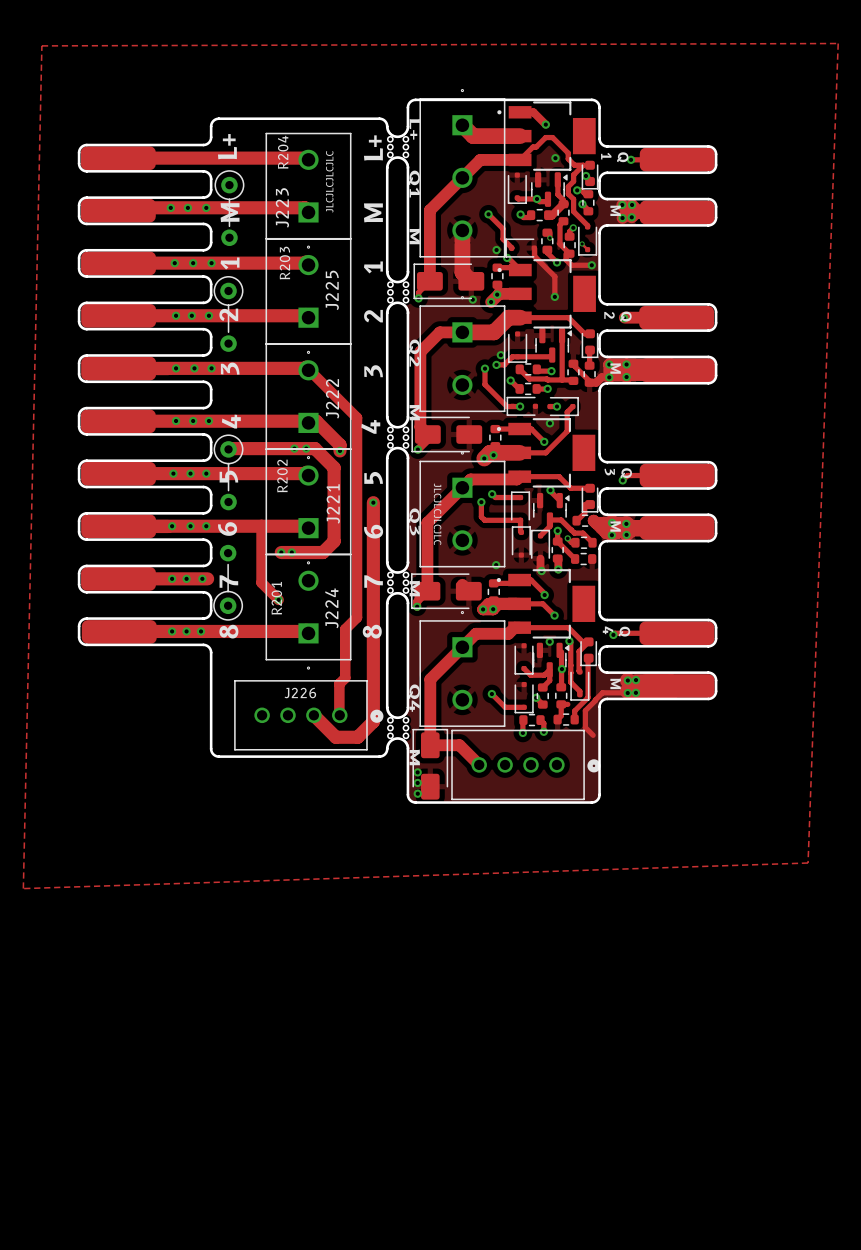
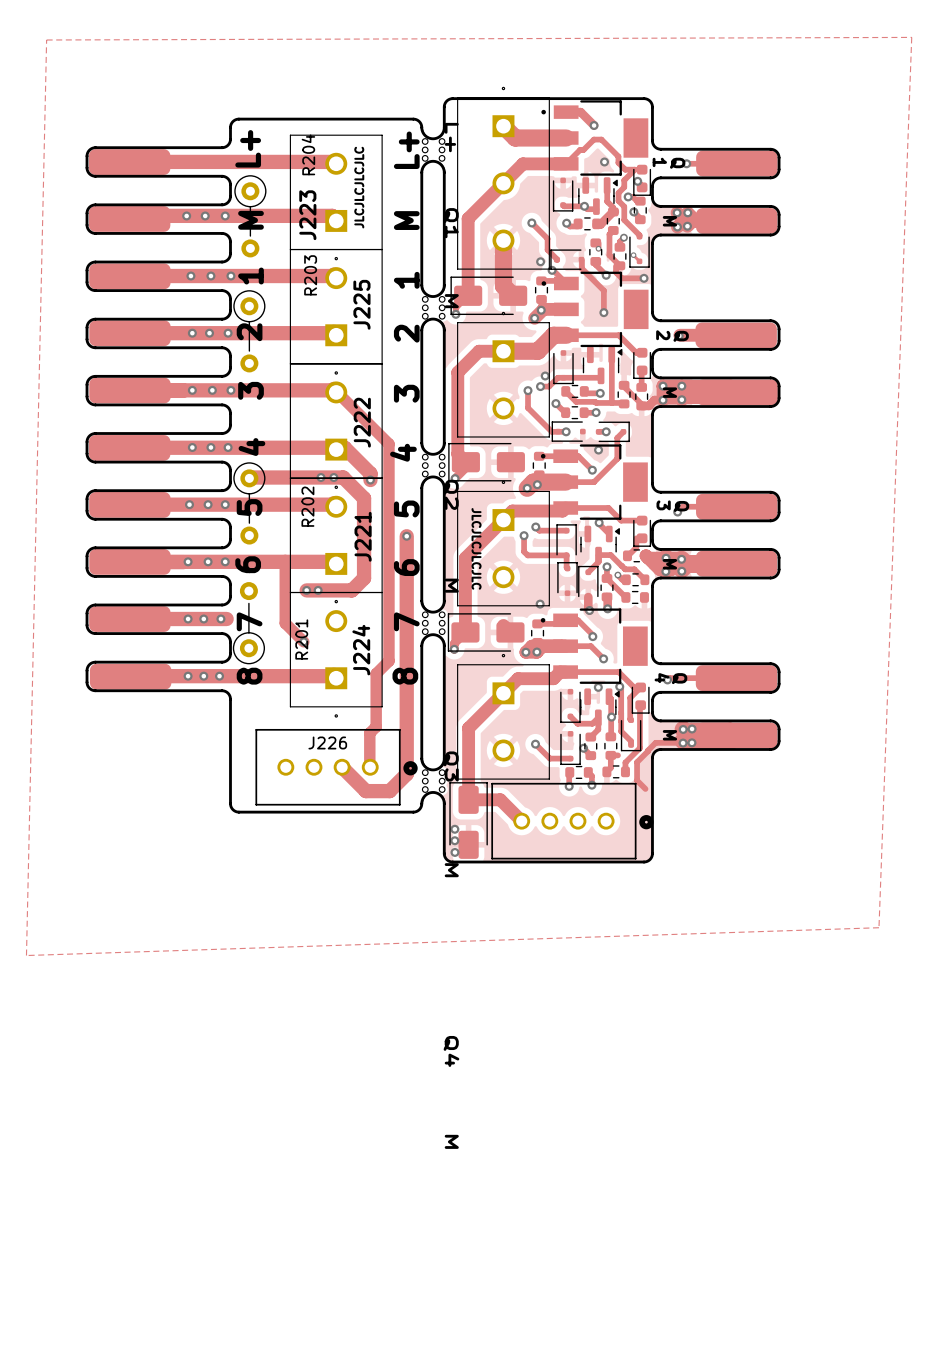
via: (472, 299) -> none

